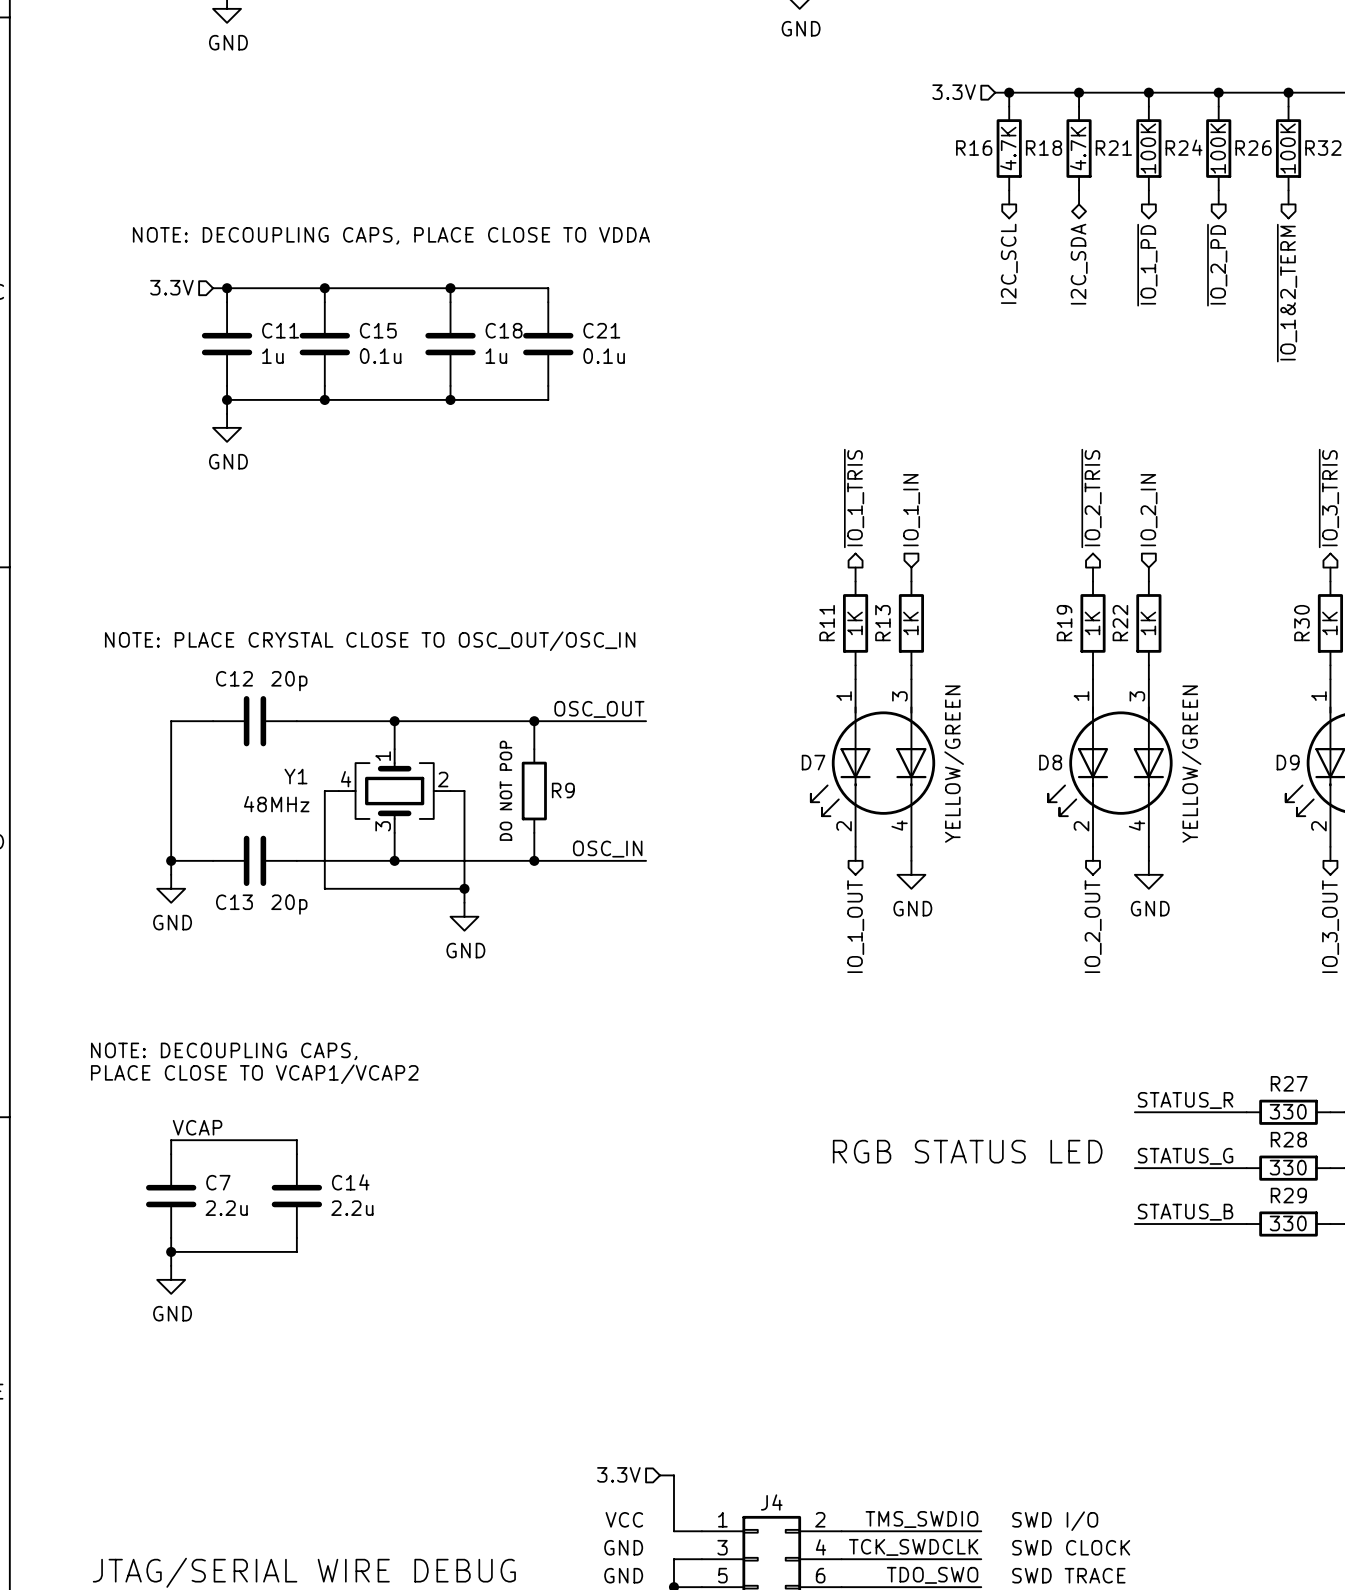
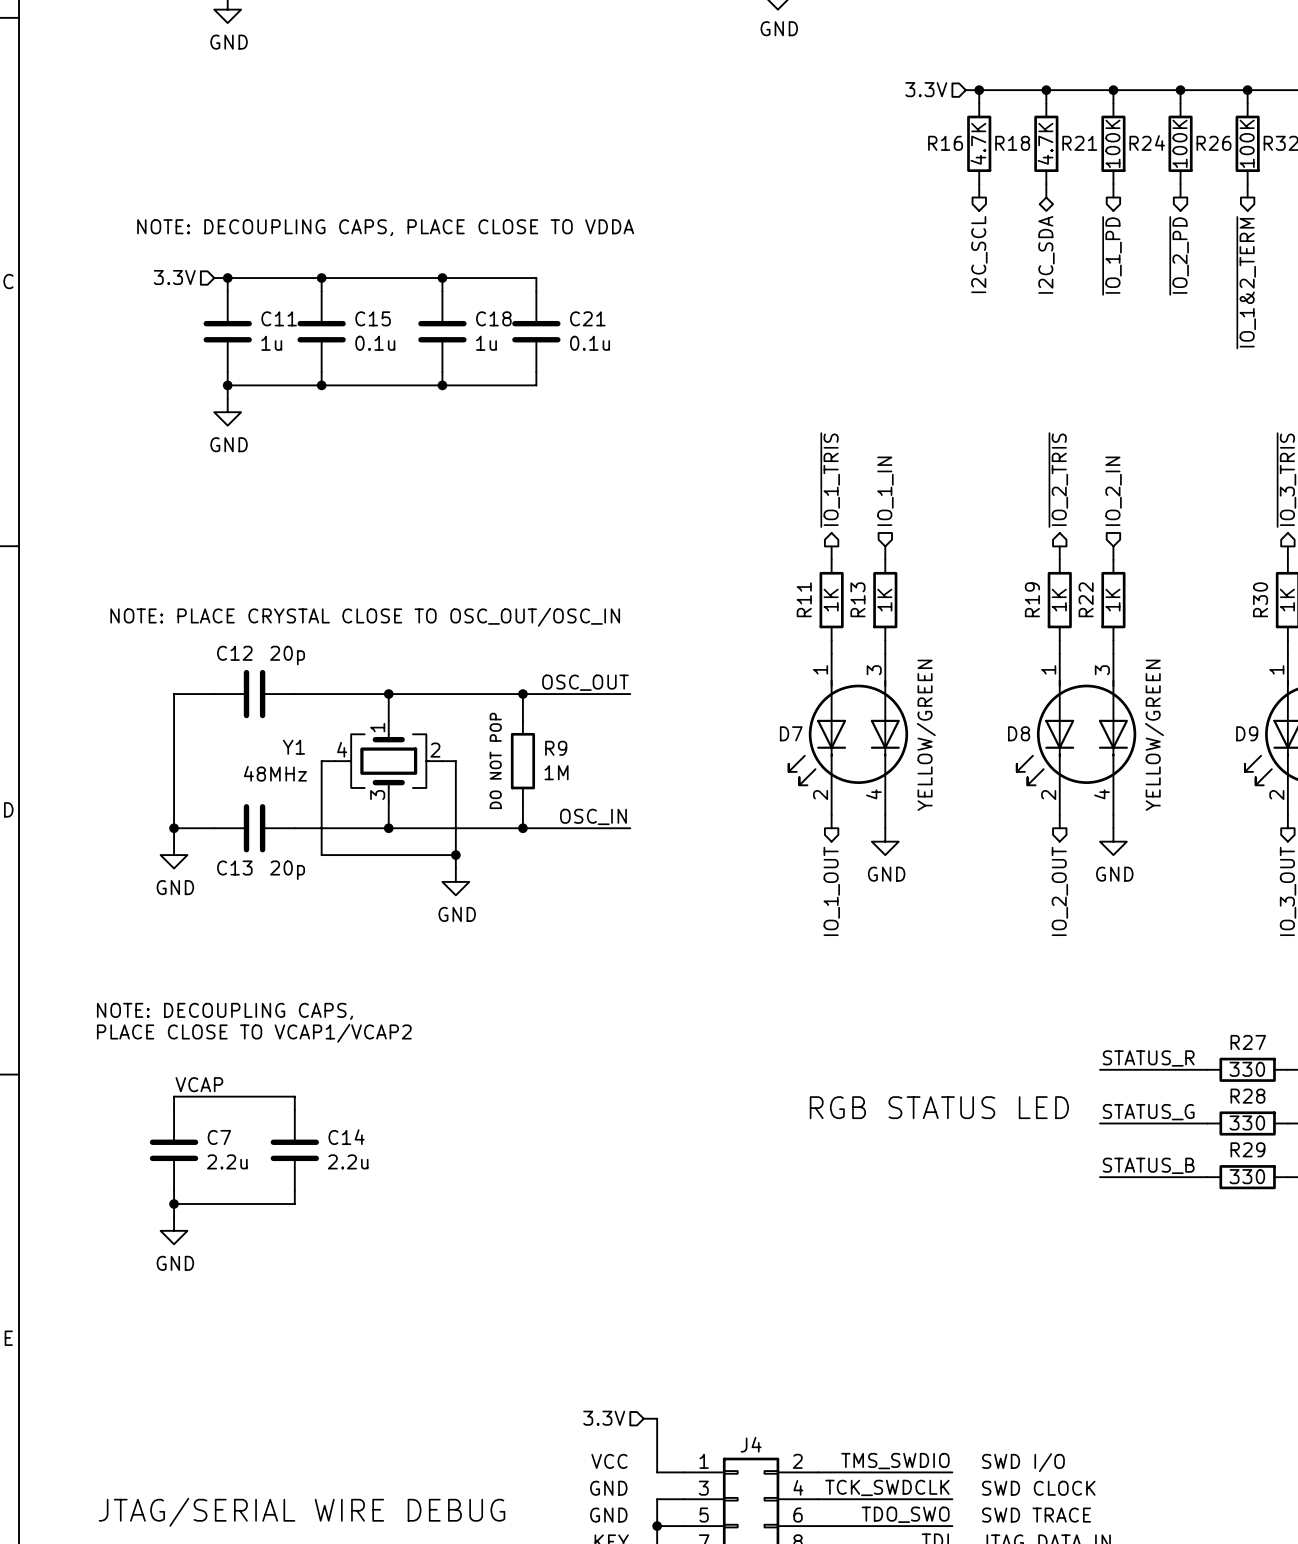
R9 name position: R9 (563, 790) -> R9 (556, 748)
R9 value: none -> 1M (556, 772)

